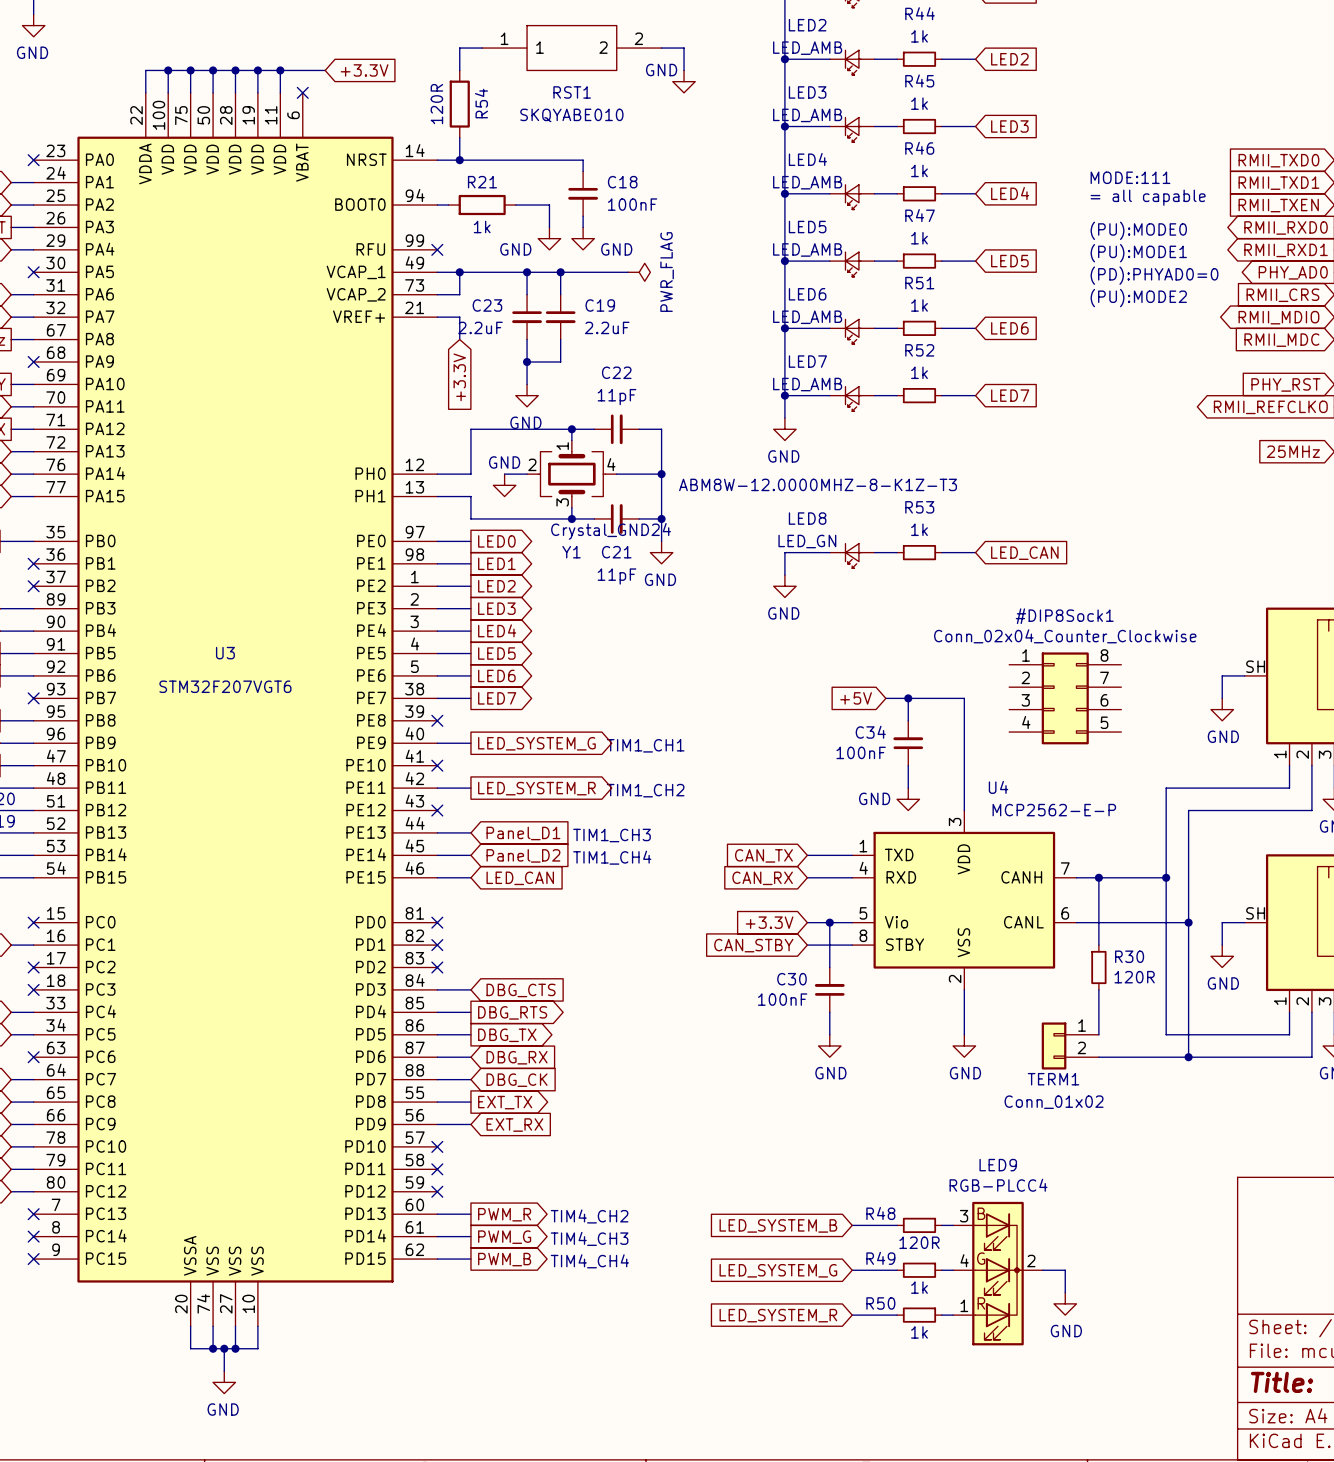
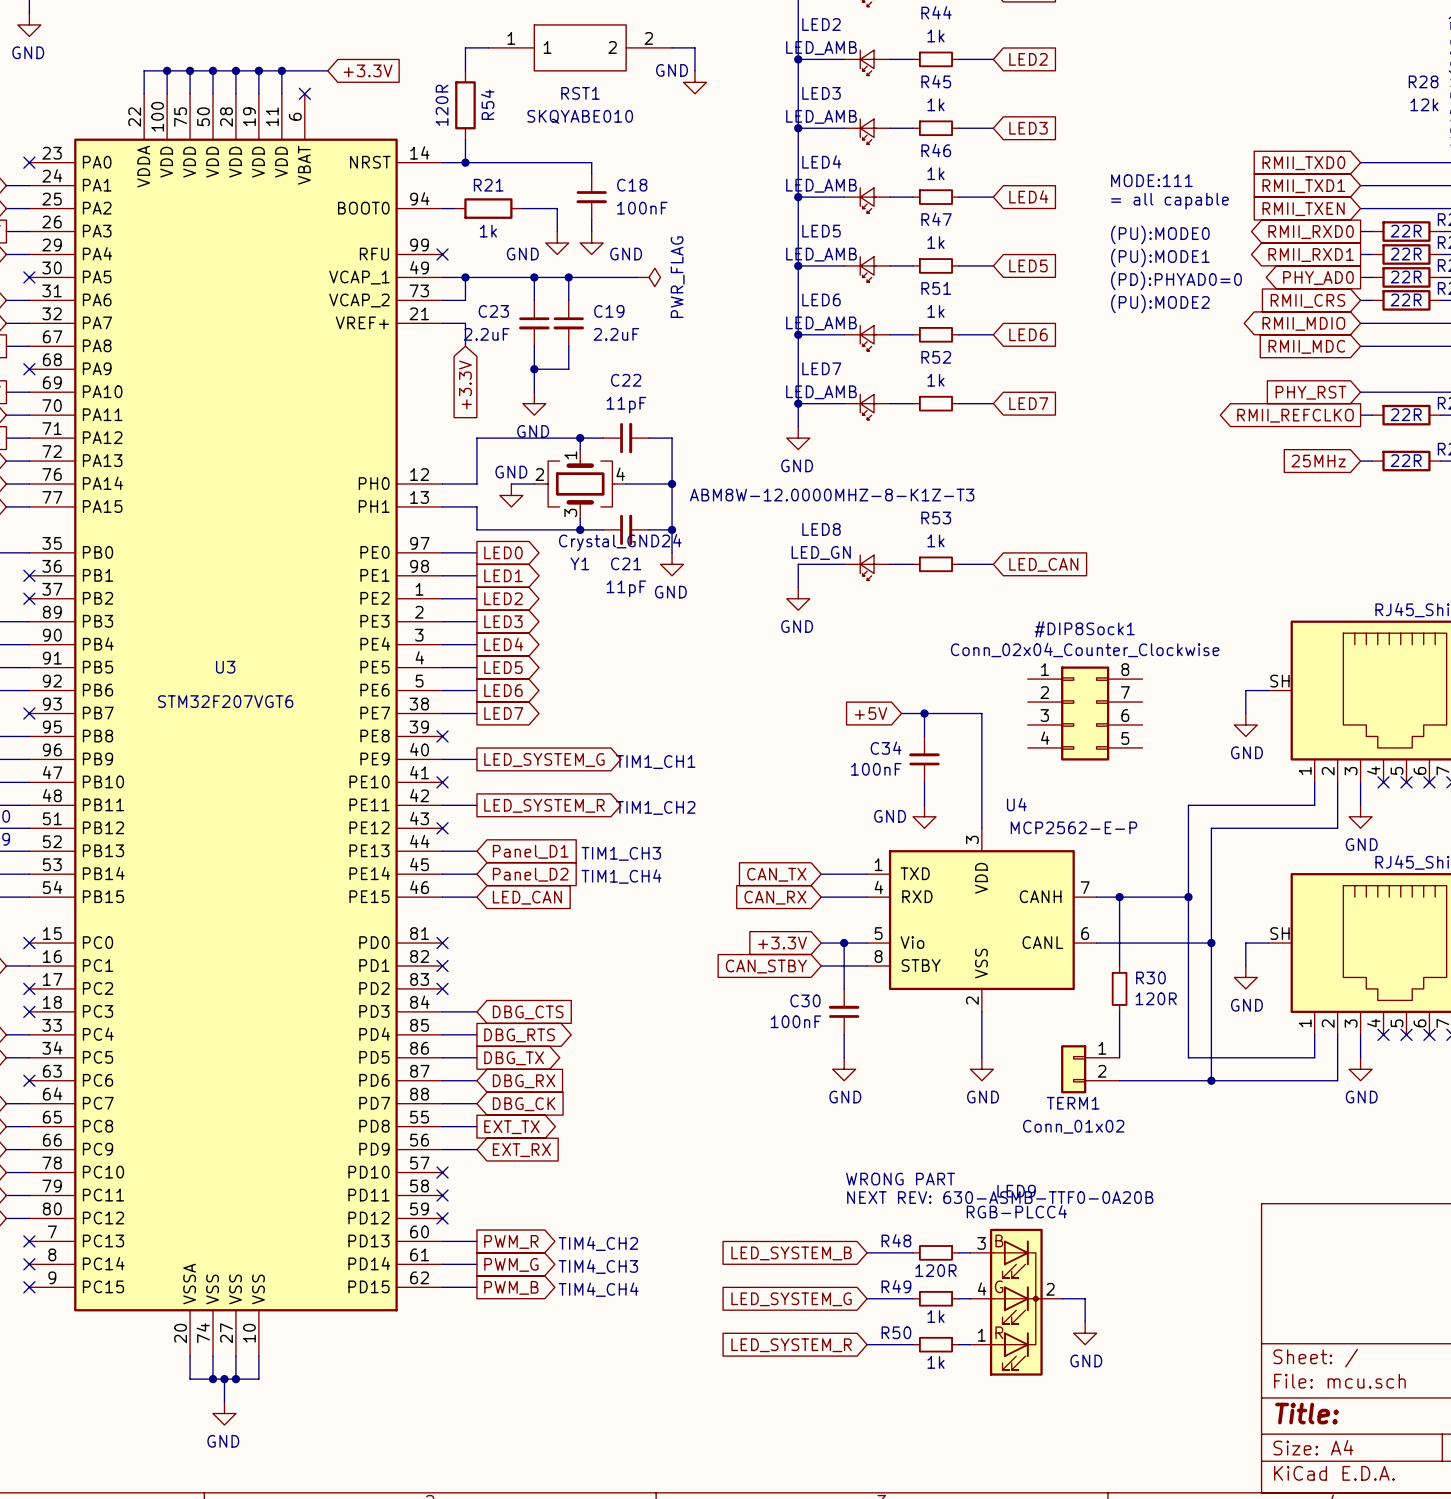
text: none -> WRONG PART (900, 1179)
text: none -> NEXT REV: 630-ASMB-TTF0-0A20B (1000, 1197)

